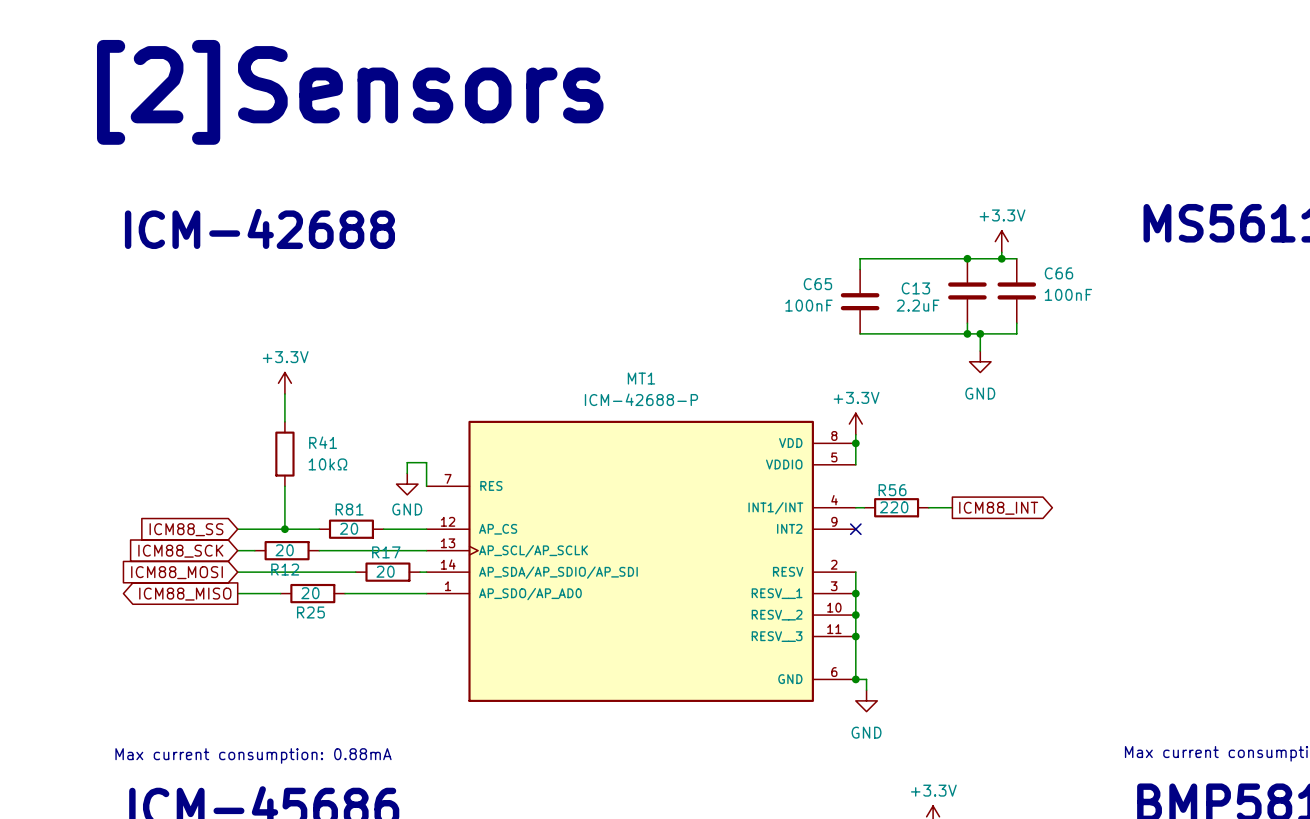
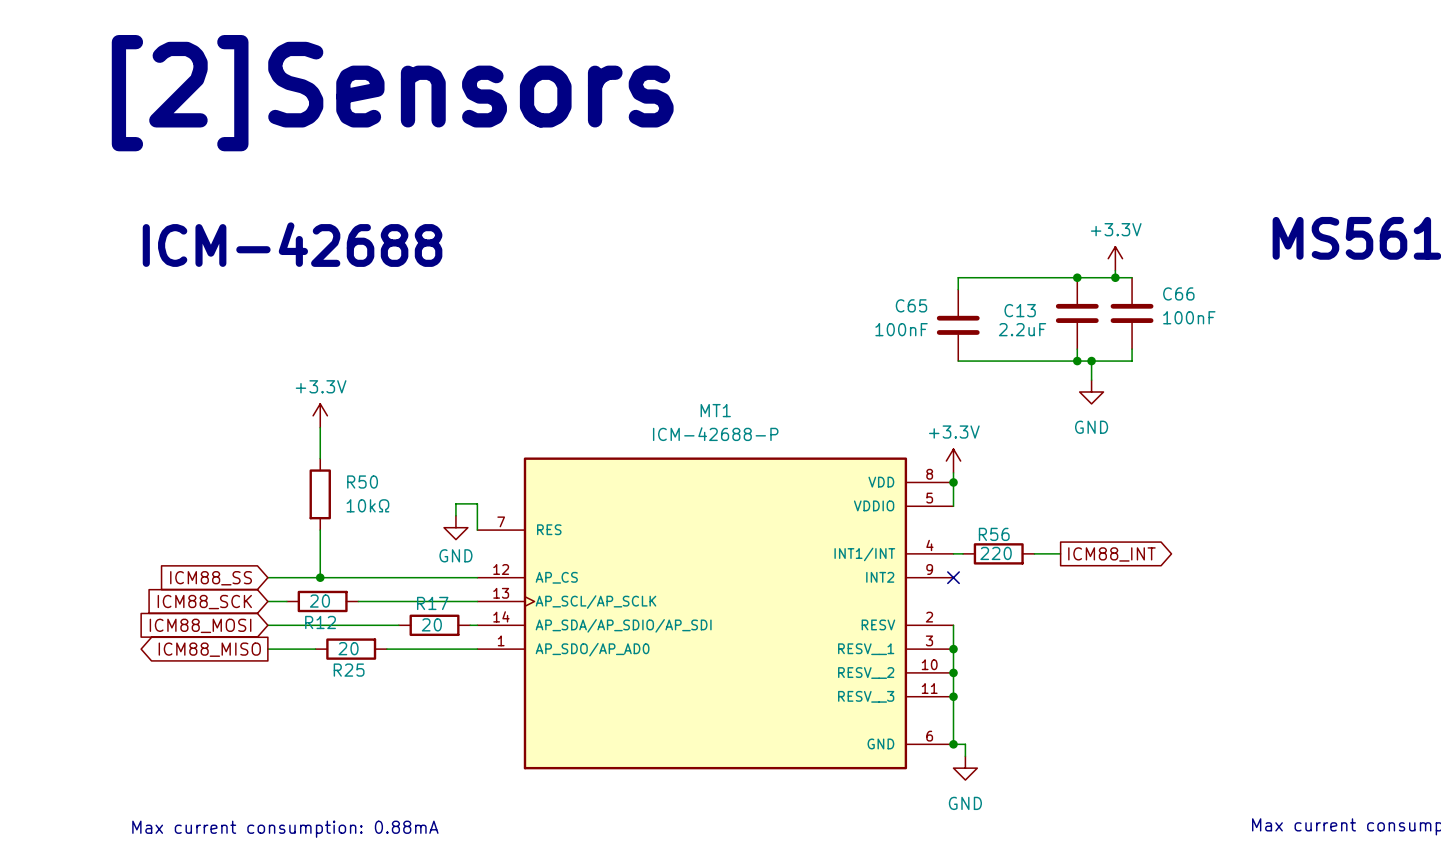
R41 name: R41 (323, 442) -> R50 (362, 482)
wire: none -> (358, 577) (429, 577)
R81: 20 (351, 529) -> none

